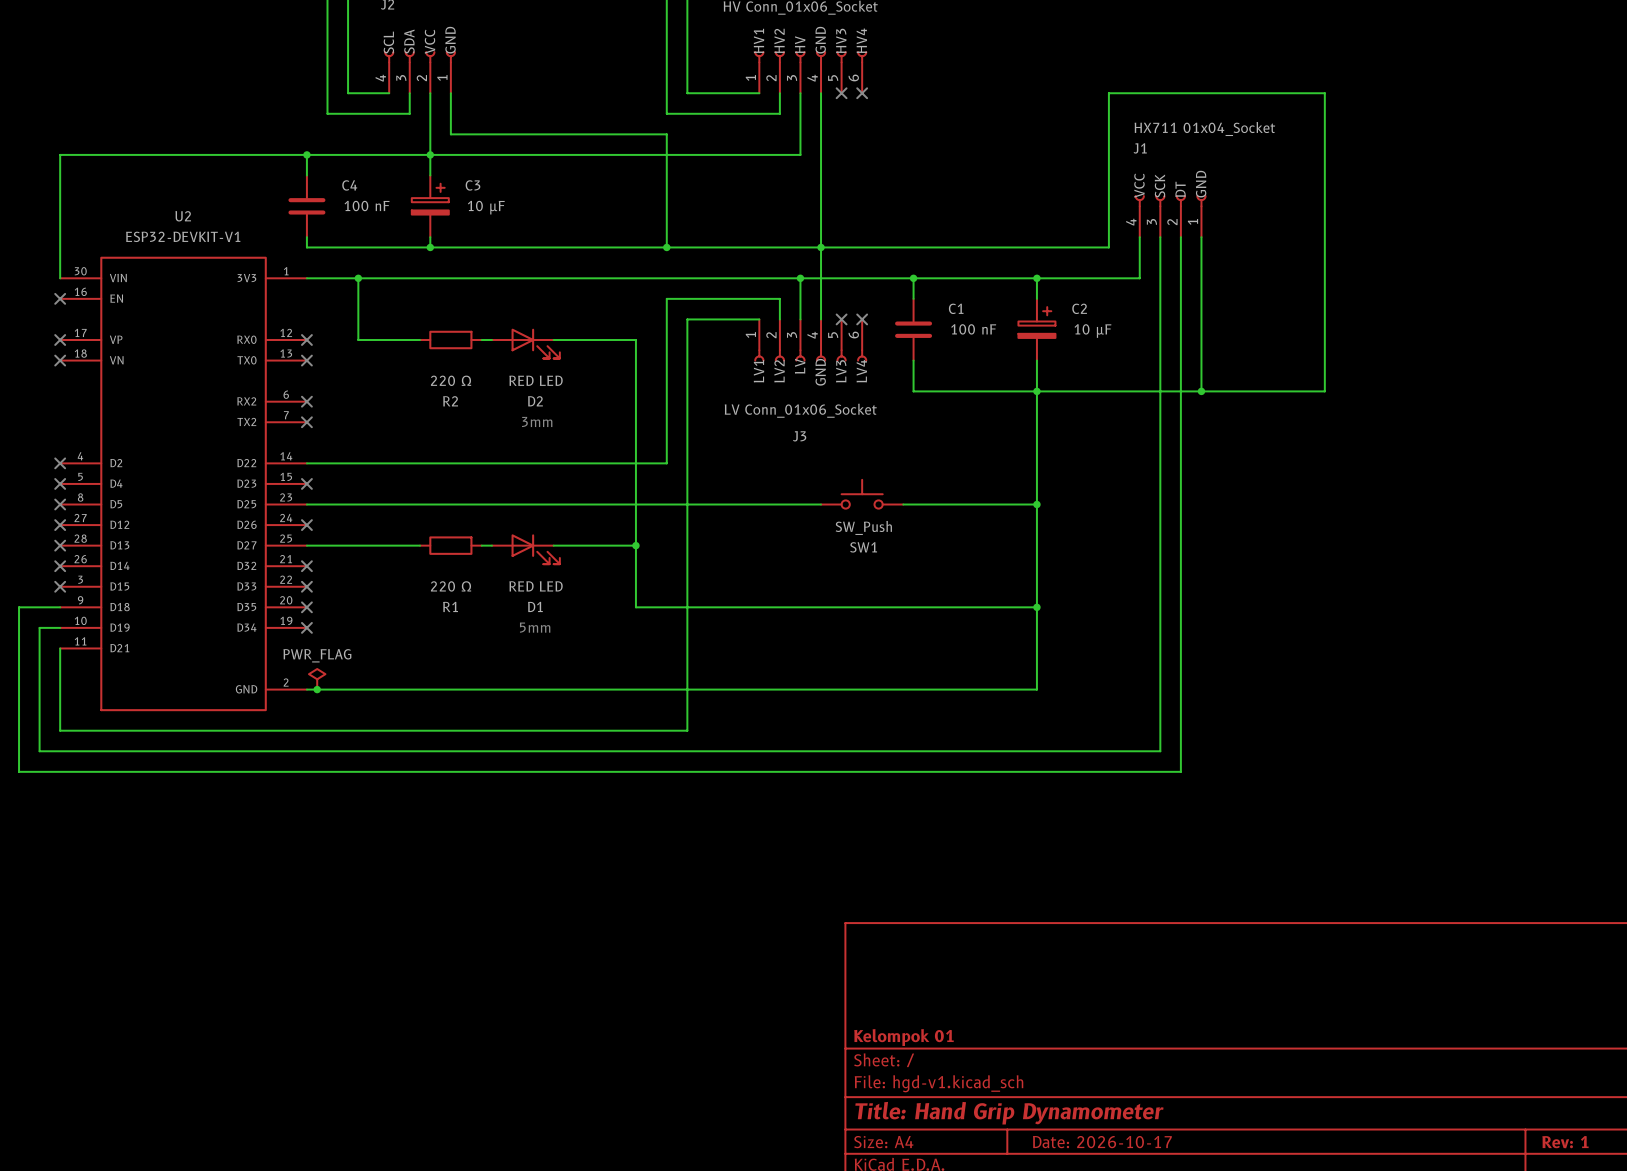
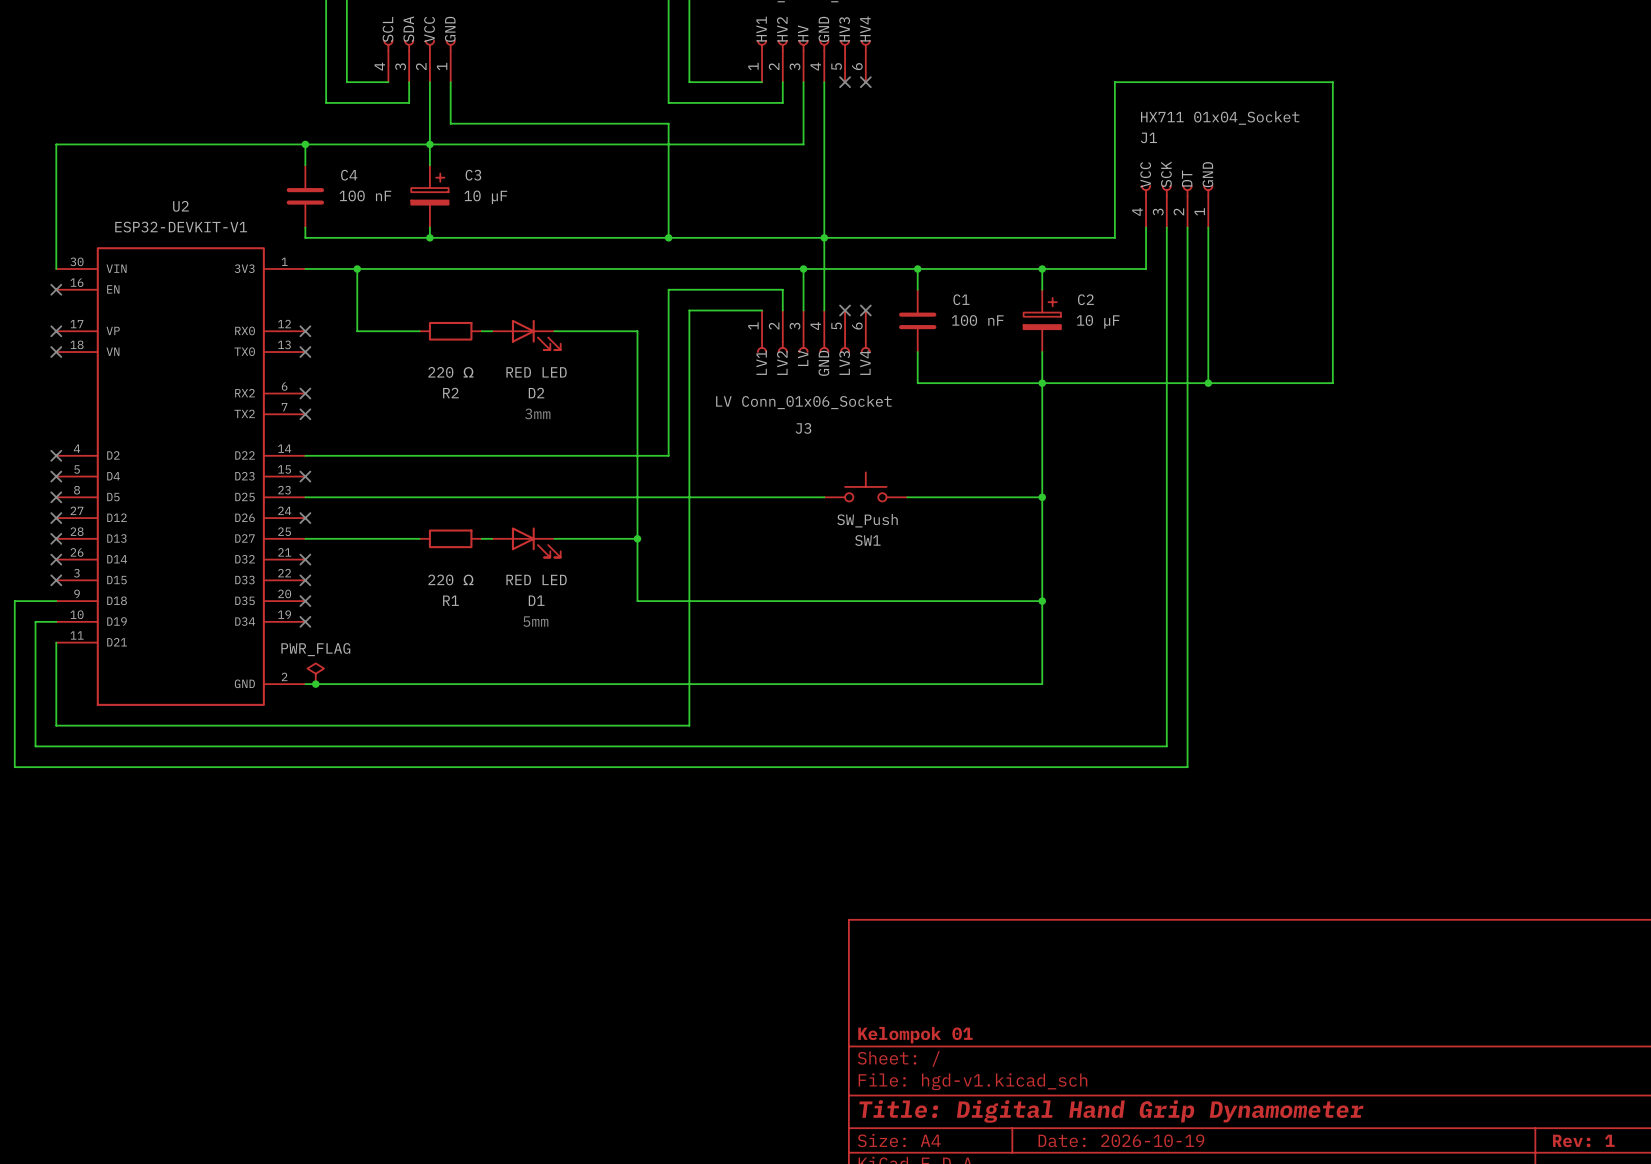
title block: Title: Hand Grip Dynamometer (1009, 1113) -> Title: Digital Hand Grip Dynamometer (1111, 1111)
title block: Date: 2026-10-17 (1102, 1142) -> Date: 2026-10-19 (1121, 1140)

